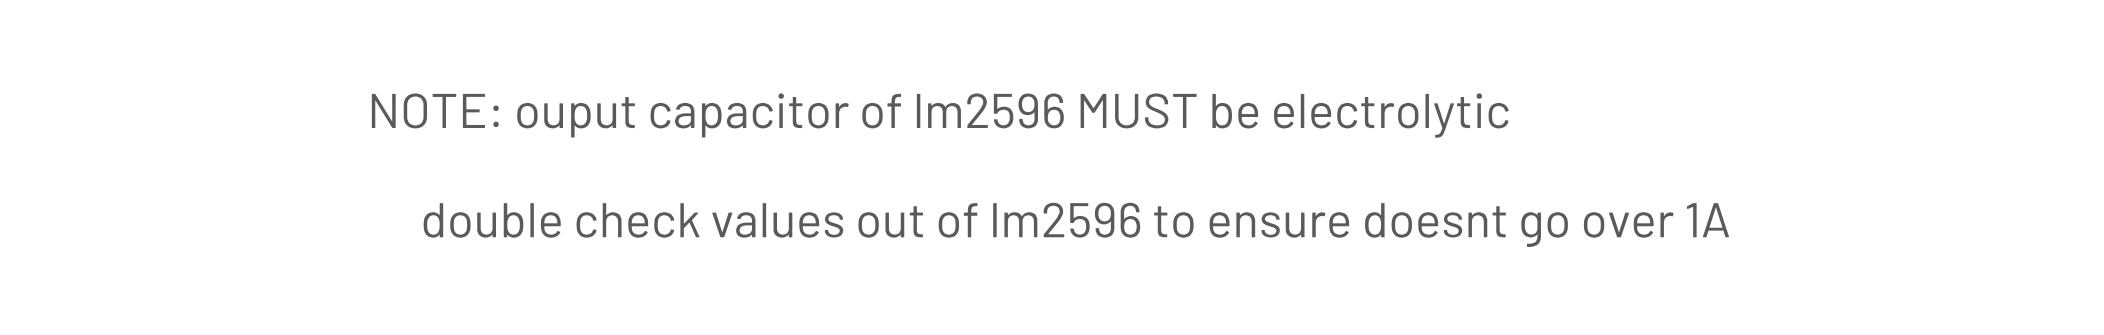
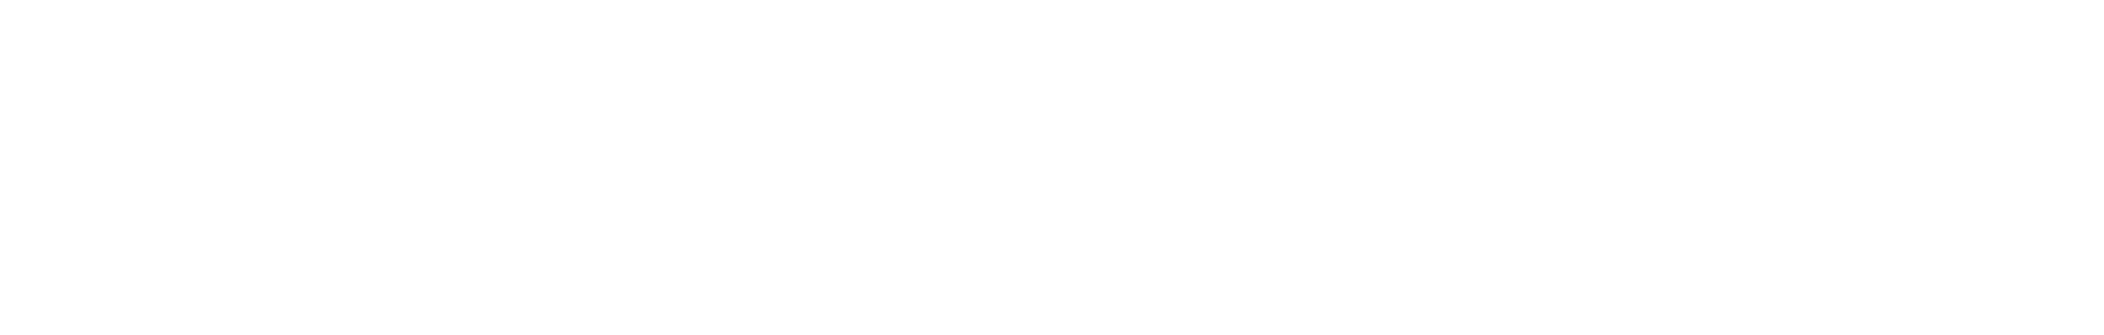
text: NOTE: ouput capacitor of lm2596 MUST be electrolytic (940, 115) -> none
text: double check values out of lm2596 to ensure doesnt go over 1A (1076, 224) -> none

